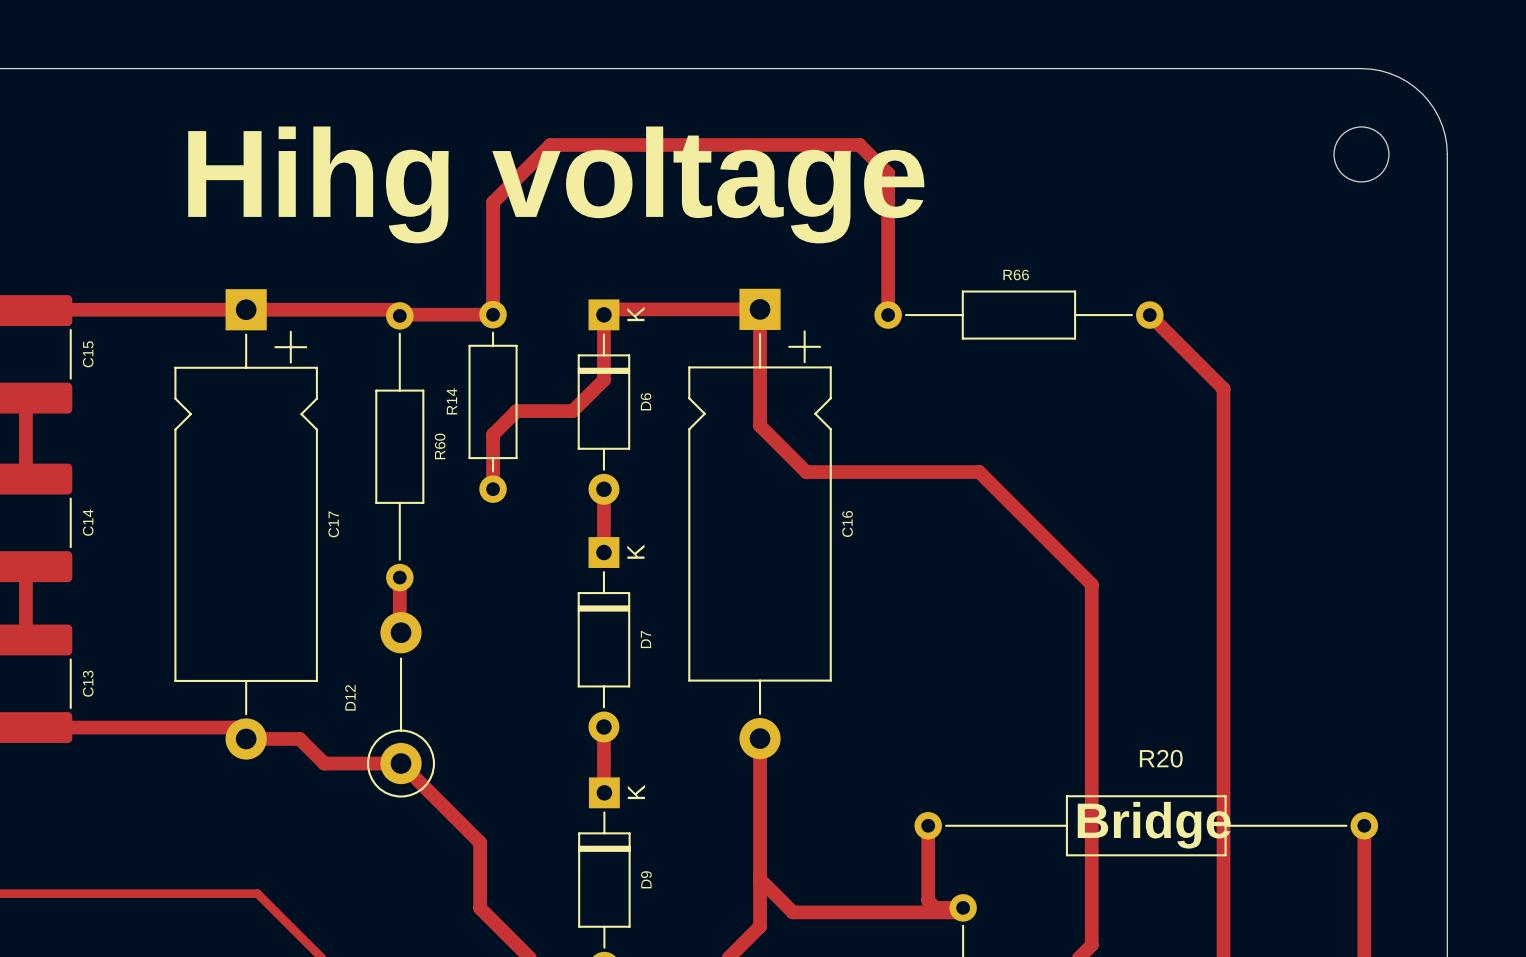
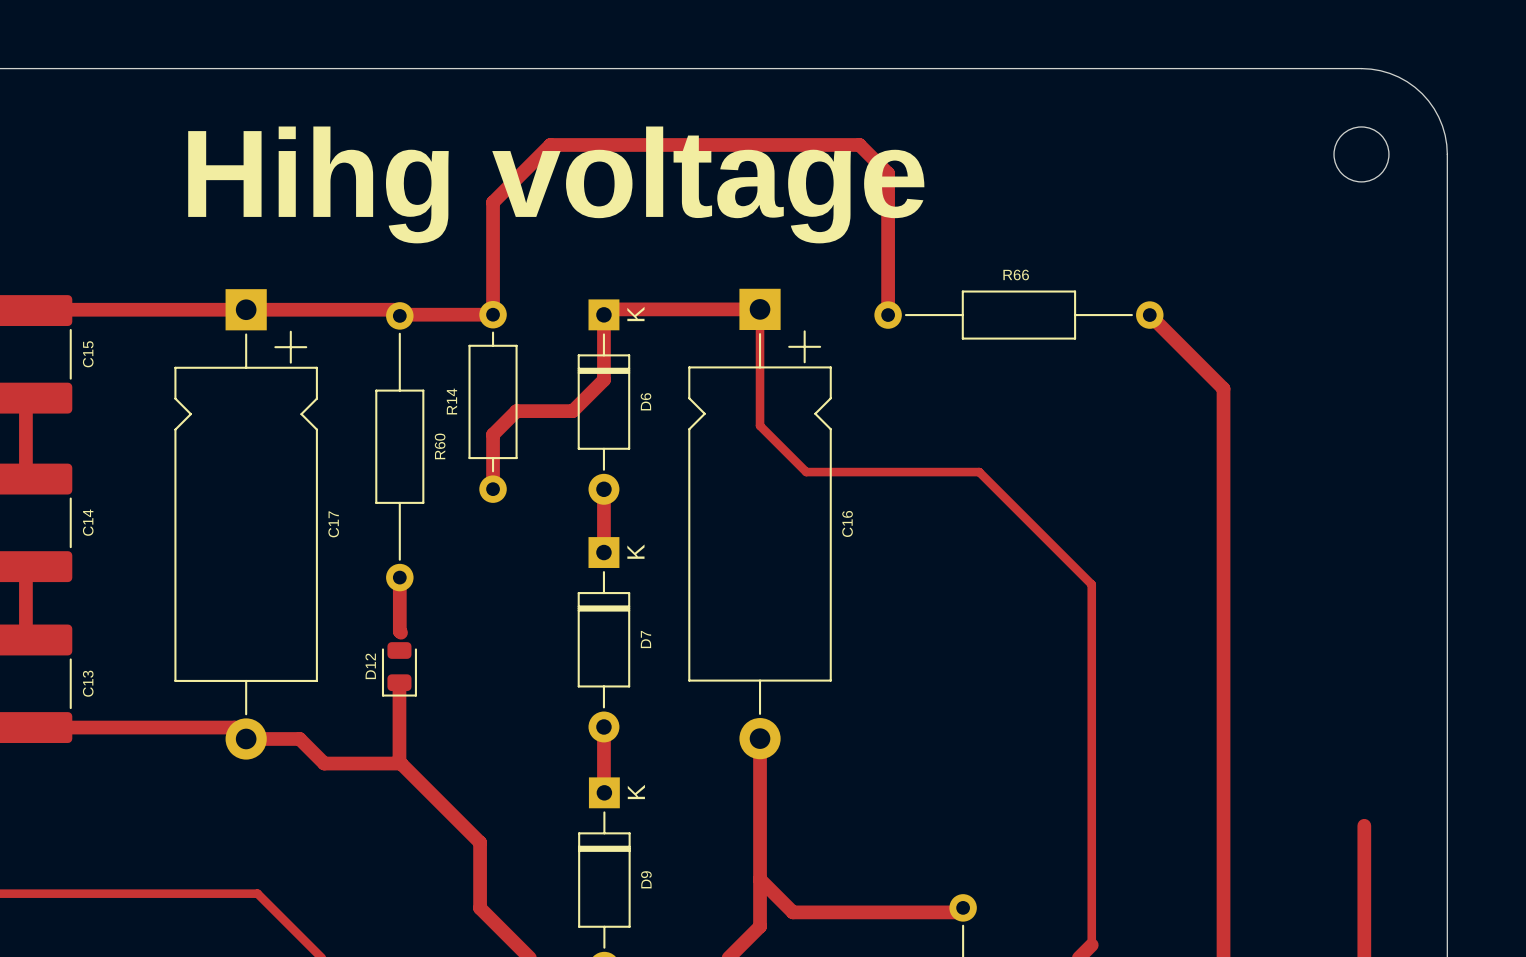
top track width: thick (760, 309) (760, 425) (806, 472) (979, 472) (1091, 584) (1091, 945) -> thin (760, 309) (760, 425) (806, 472) (979, 472) (1091, 584) (1091, 945)
D12 footprint: [367, 612, 436, 798] -> [381, 642, 417, 697]
top track: none -> (399, 682) (399, 761) (401, 763)
top track: (928, 825) (928, 900) (935, 907) (963, 907) -> none
R20: (1146, 825) -> none
text: Bridge (1154, 825) -> none

